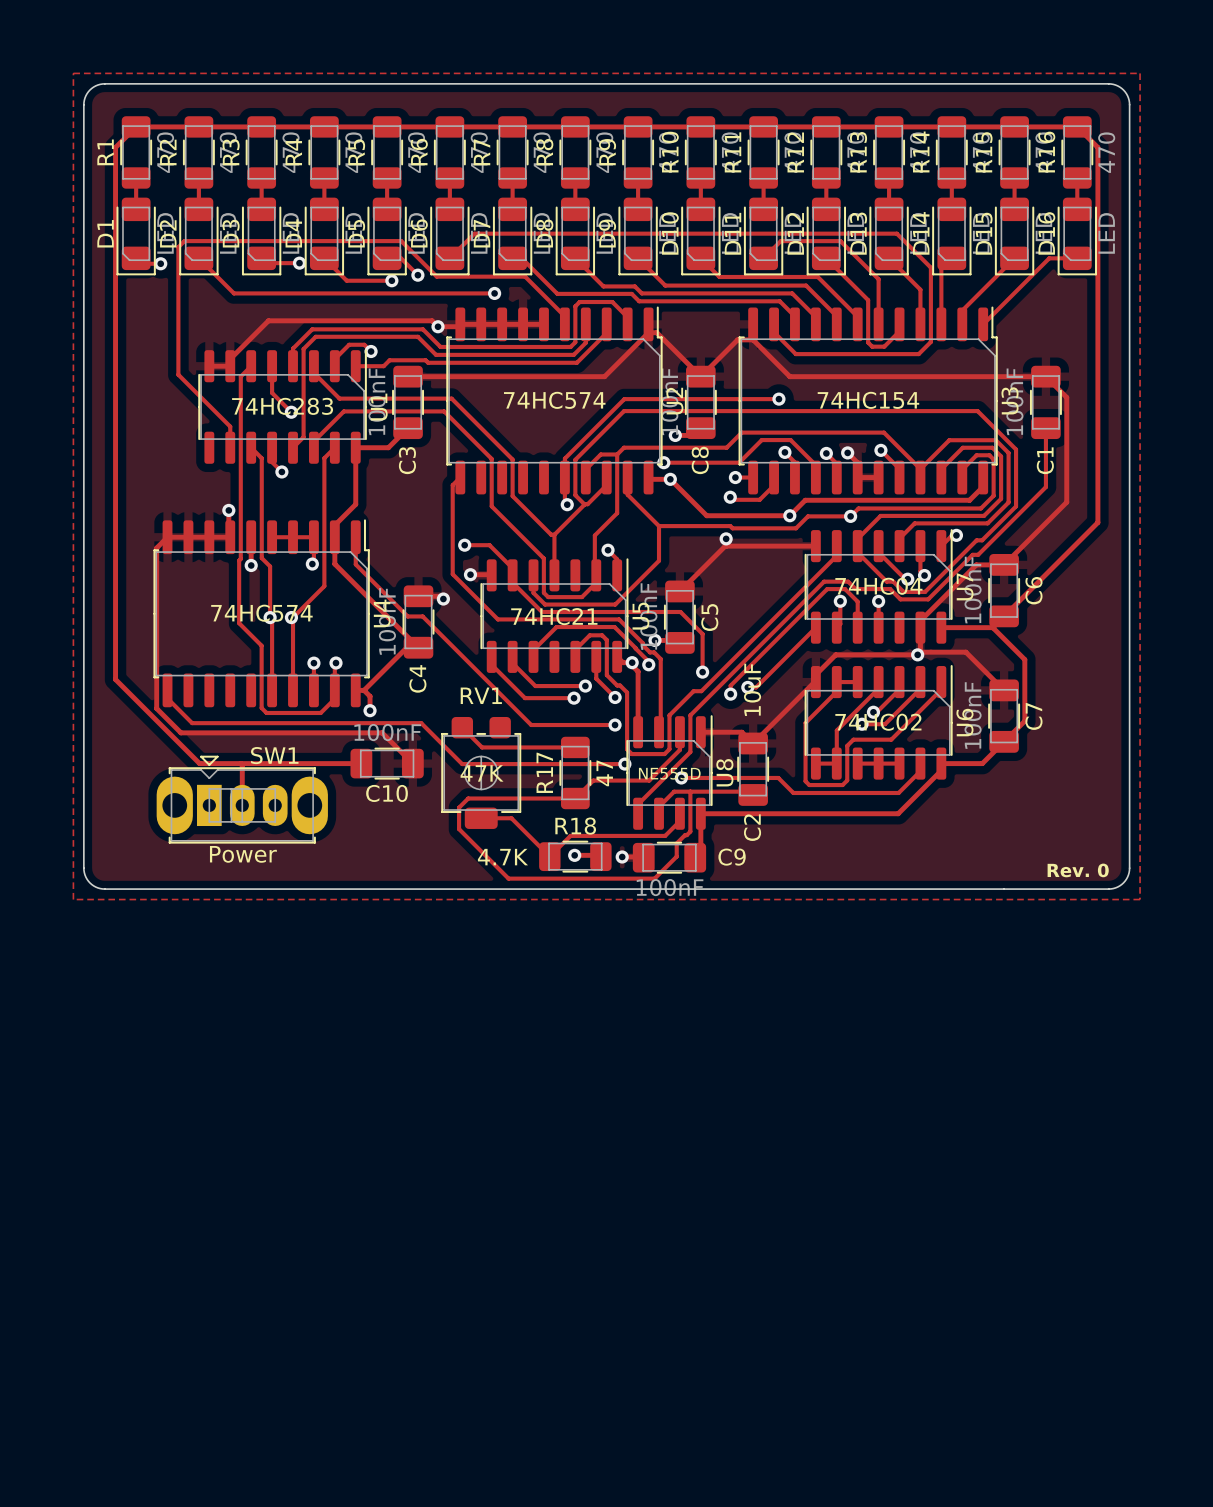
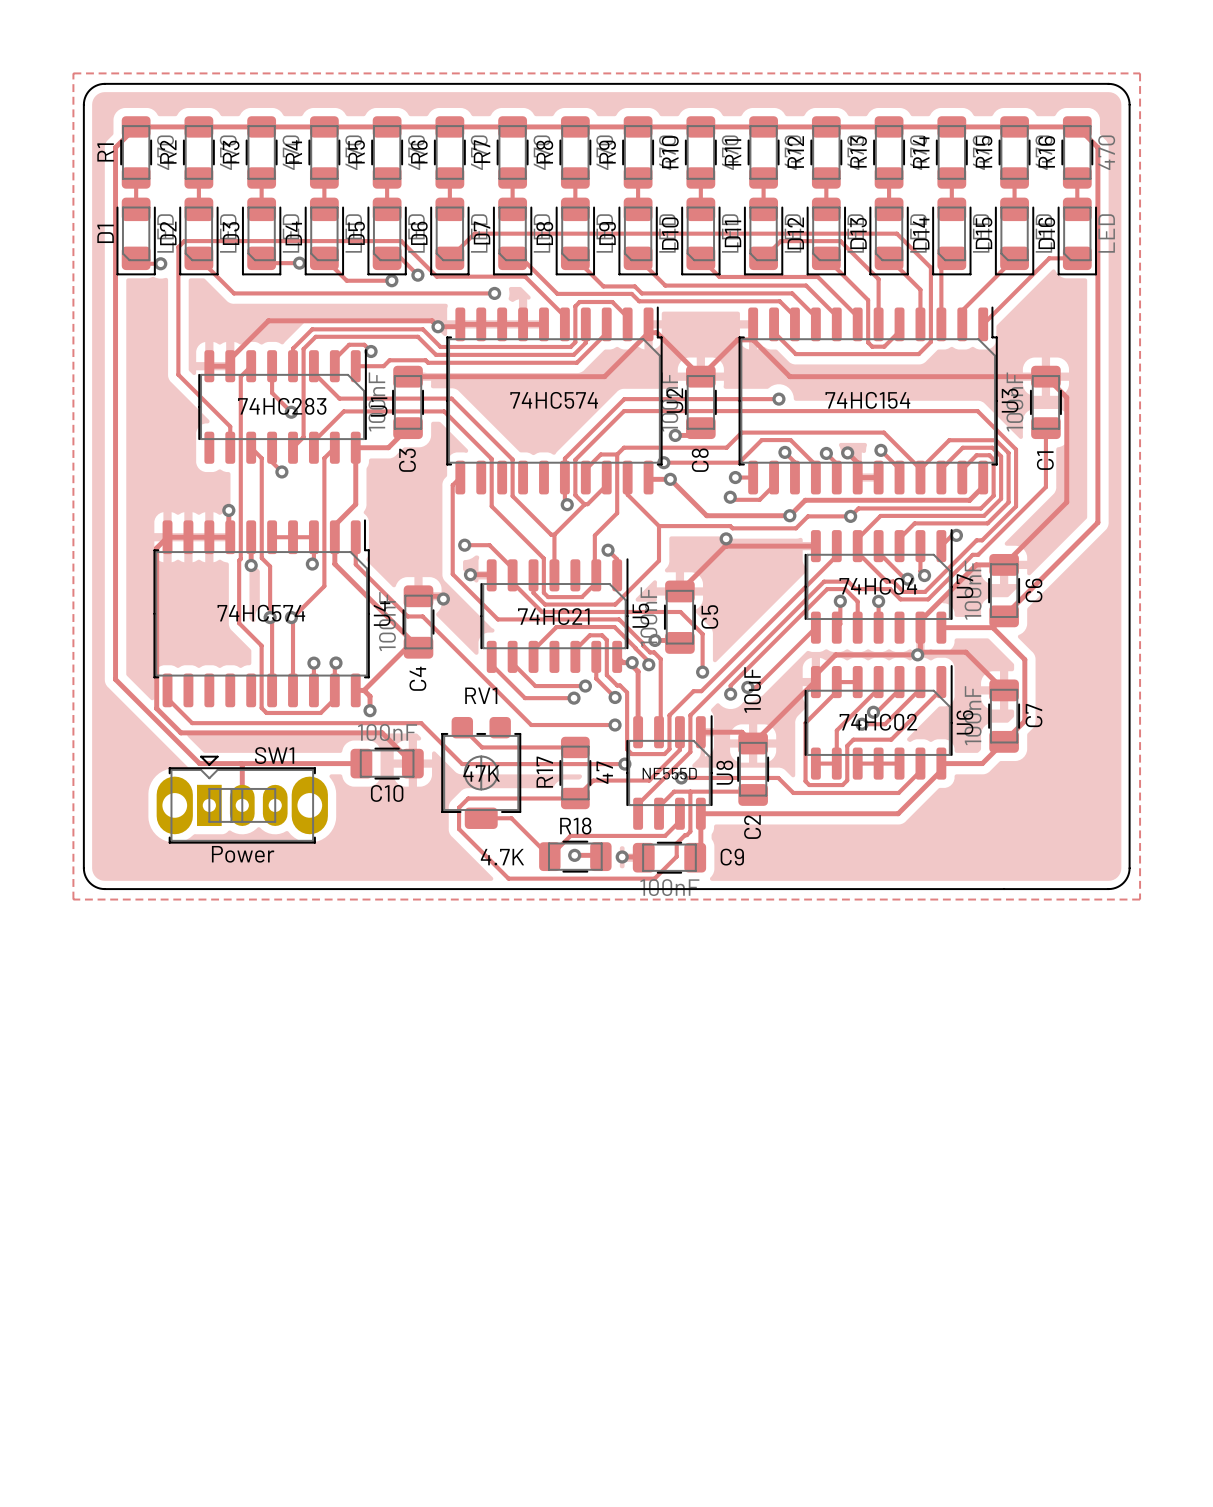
text: Rev. 0 (1078, 870) -> none

